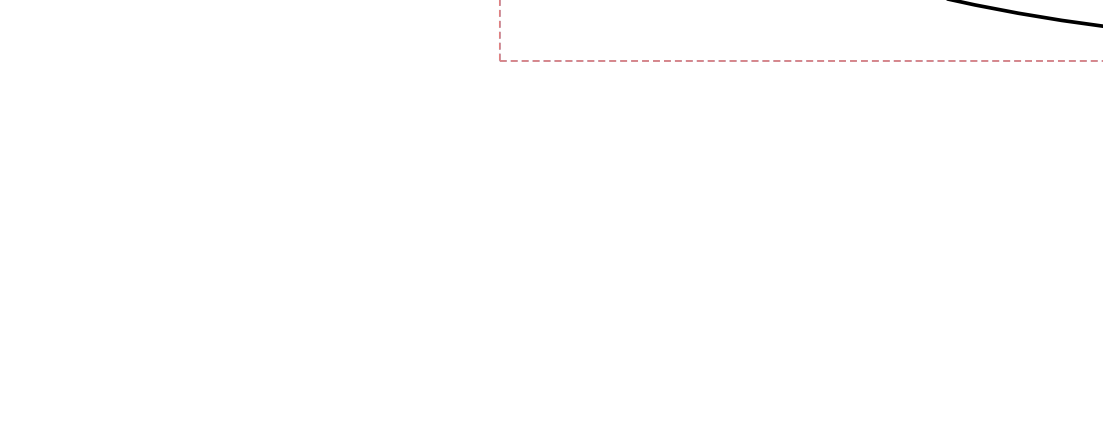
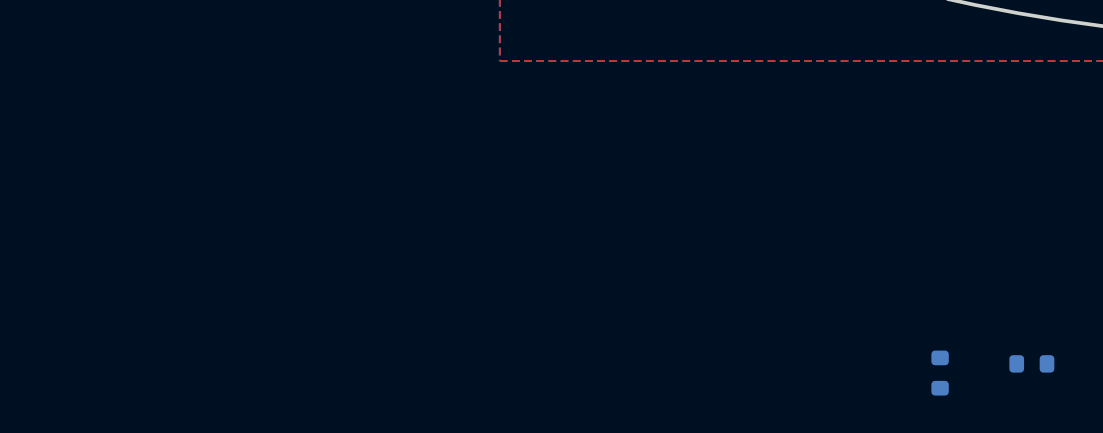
part: none -> (1031, 363)
part: none -> (940, 373)

